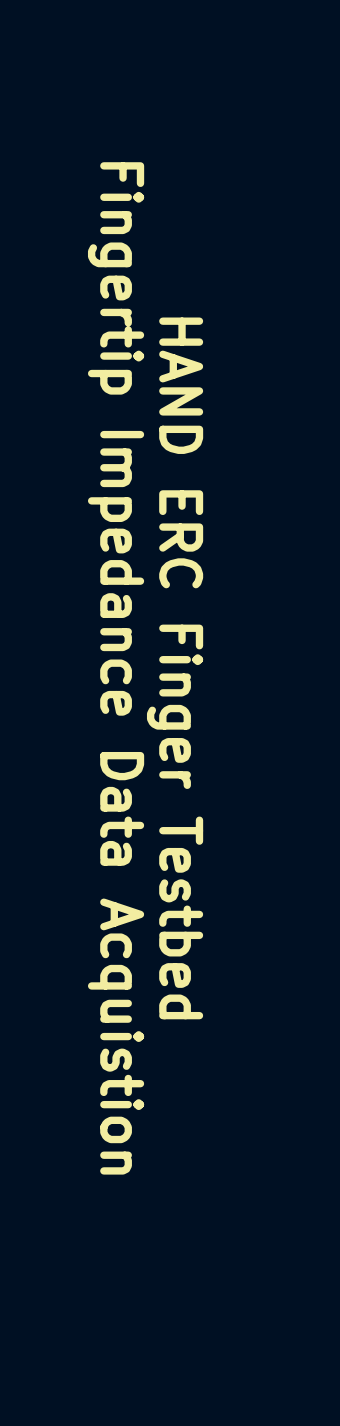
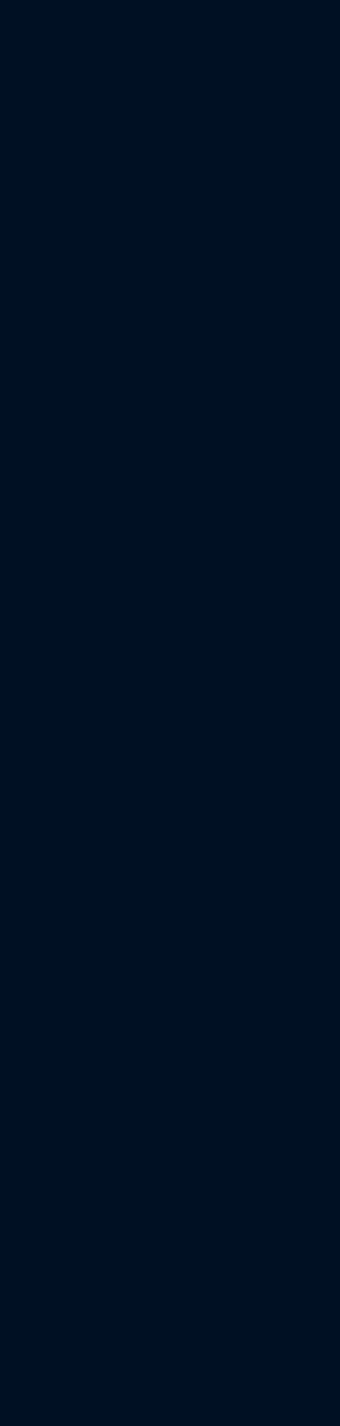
text: Fingertip Impedance Data Acquistion (116, 668) -> none
text: HAND ERC Finger Testbed (175, 668) -> none

